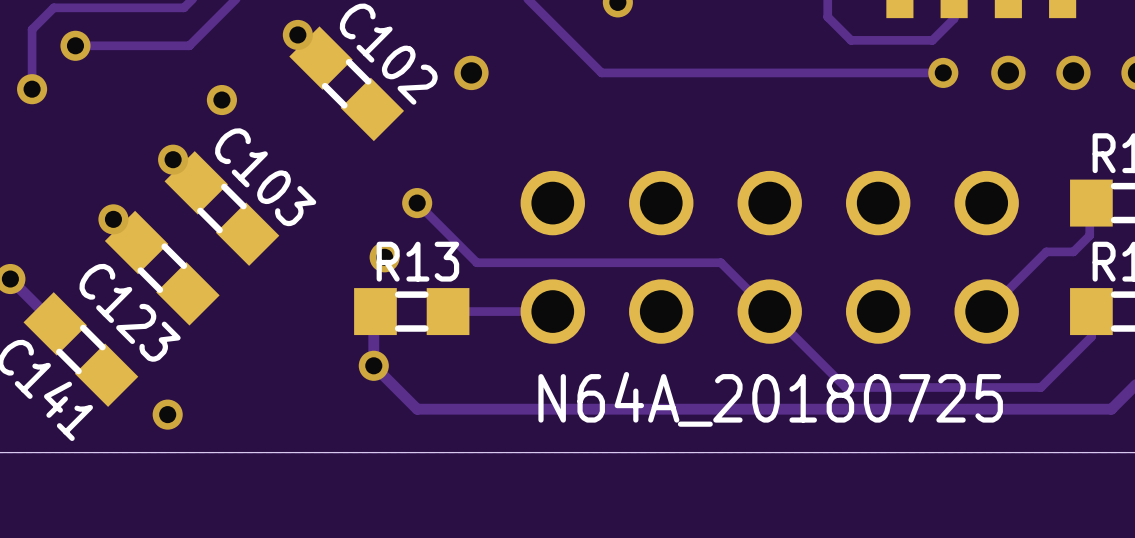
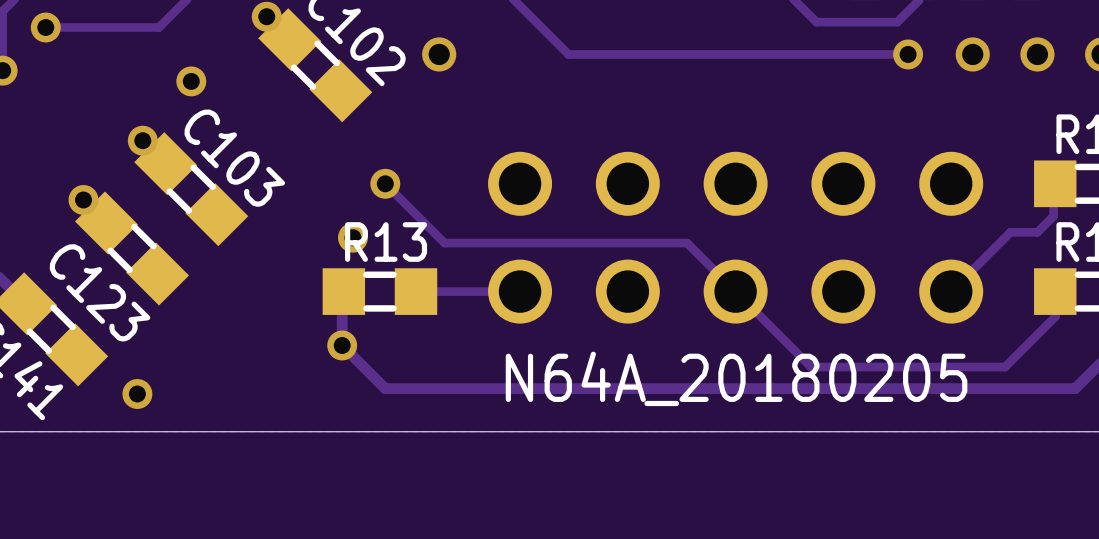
text: N64A_20180725 (770, 399) -> N64A_20180205 (736, 378)

